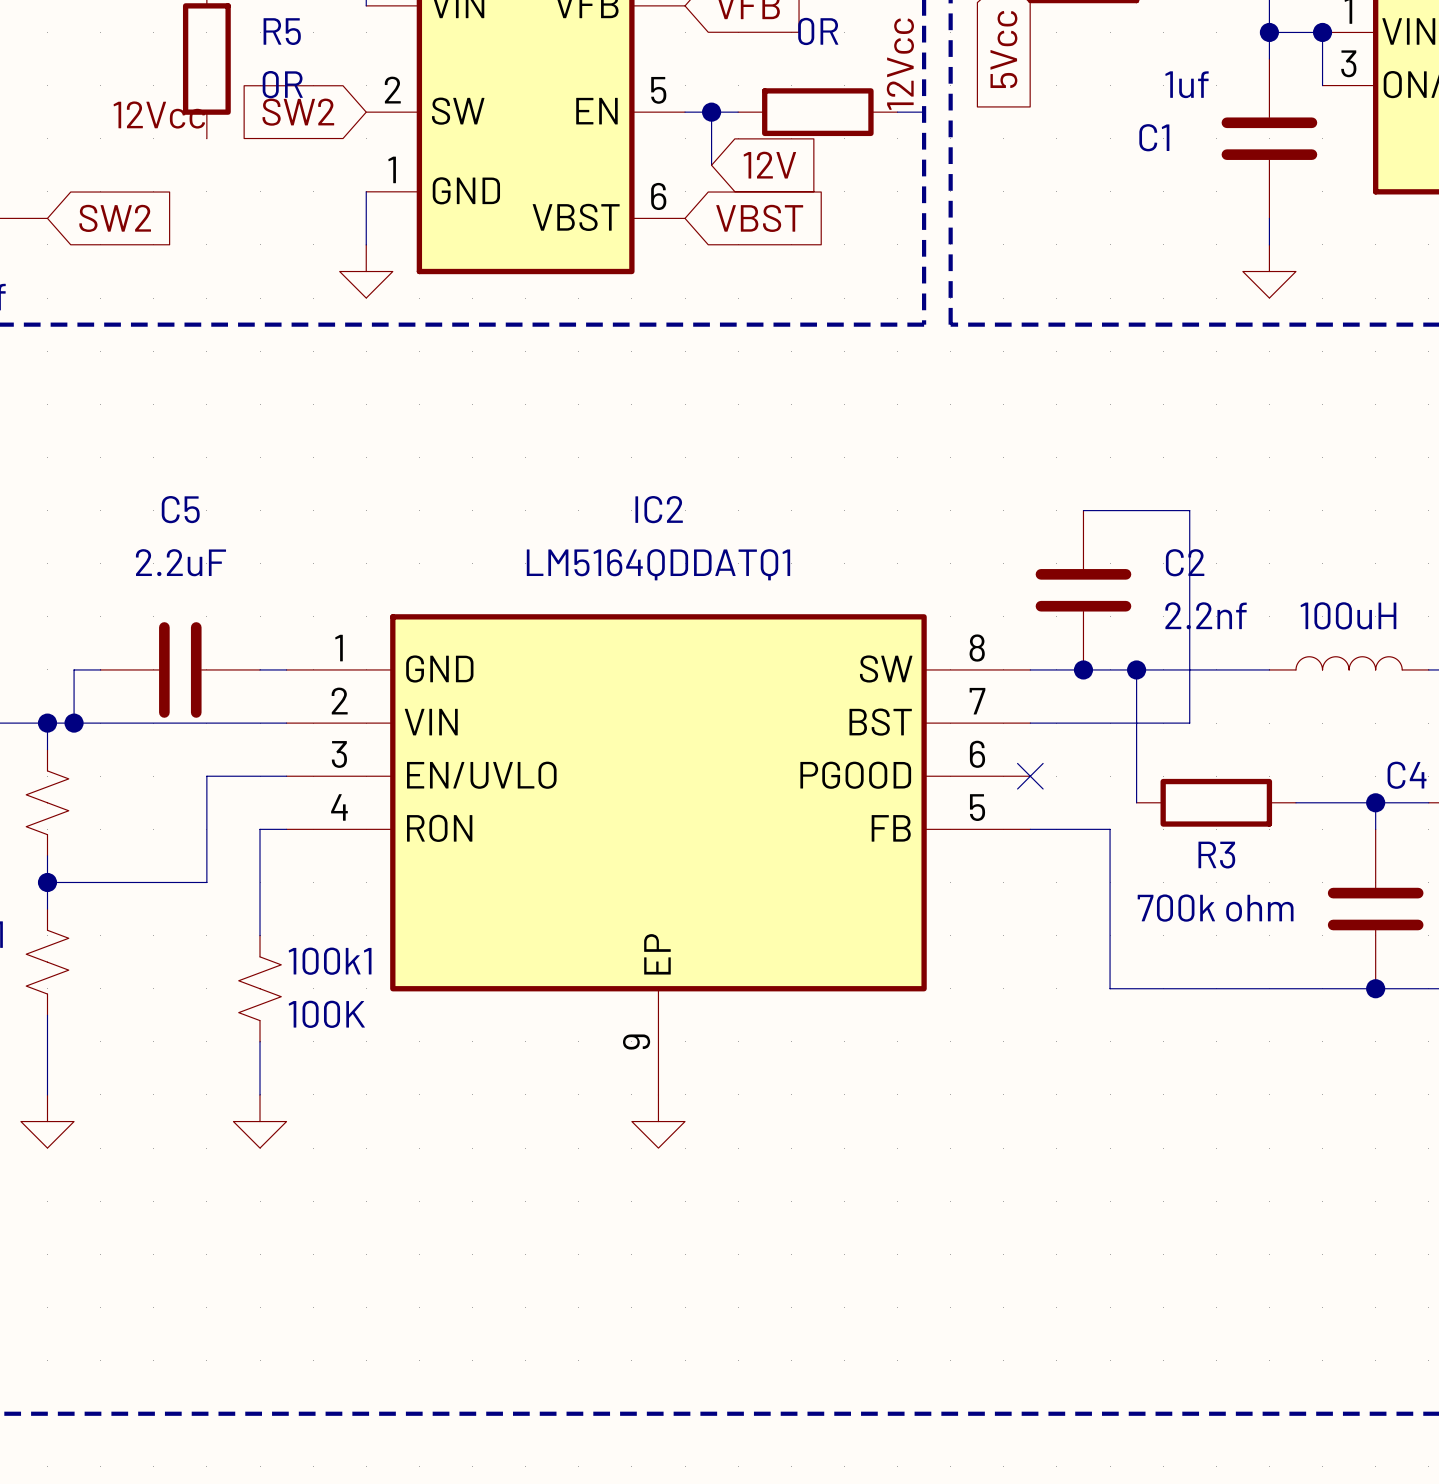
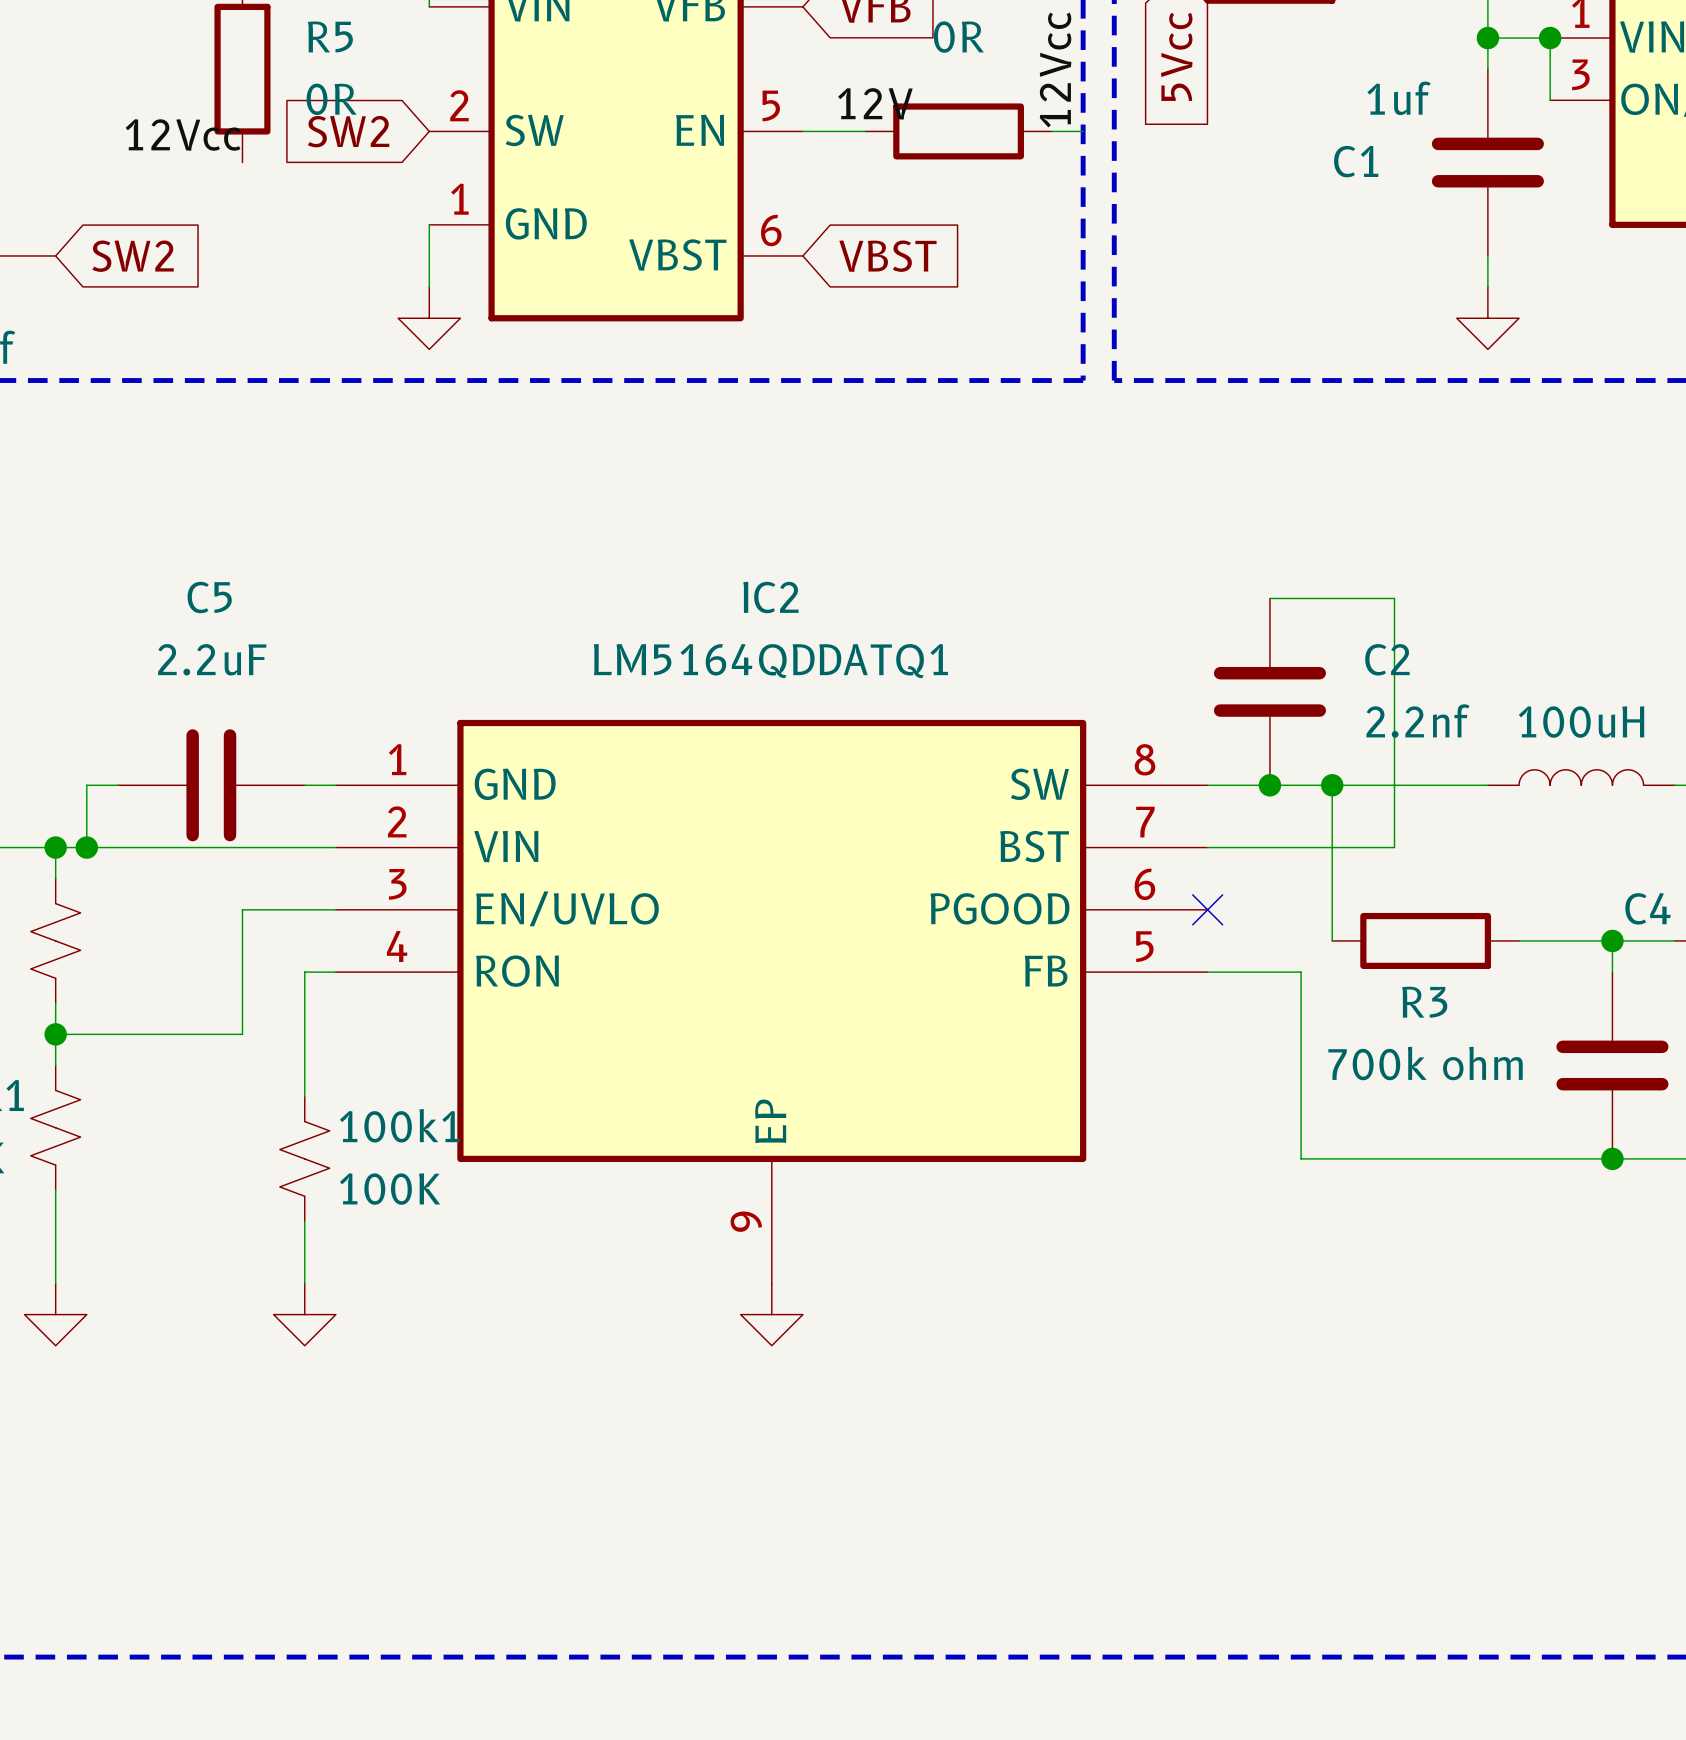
label: none -> 12V (875, 103)
wire: (711, 112) (711, 165) -> none
junction: (711, 112) -> none
global label: 12V (769, 165) -> none

